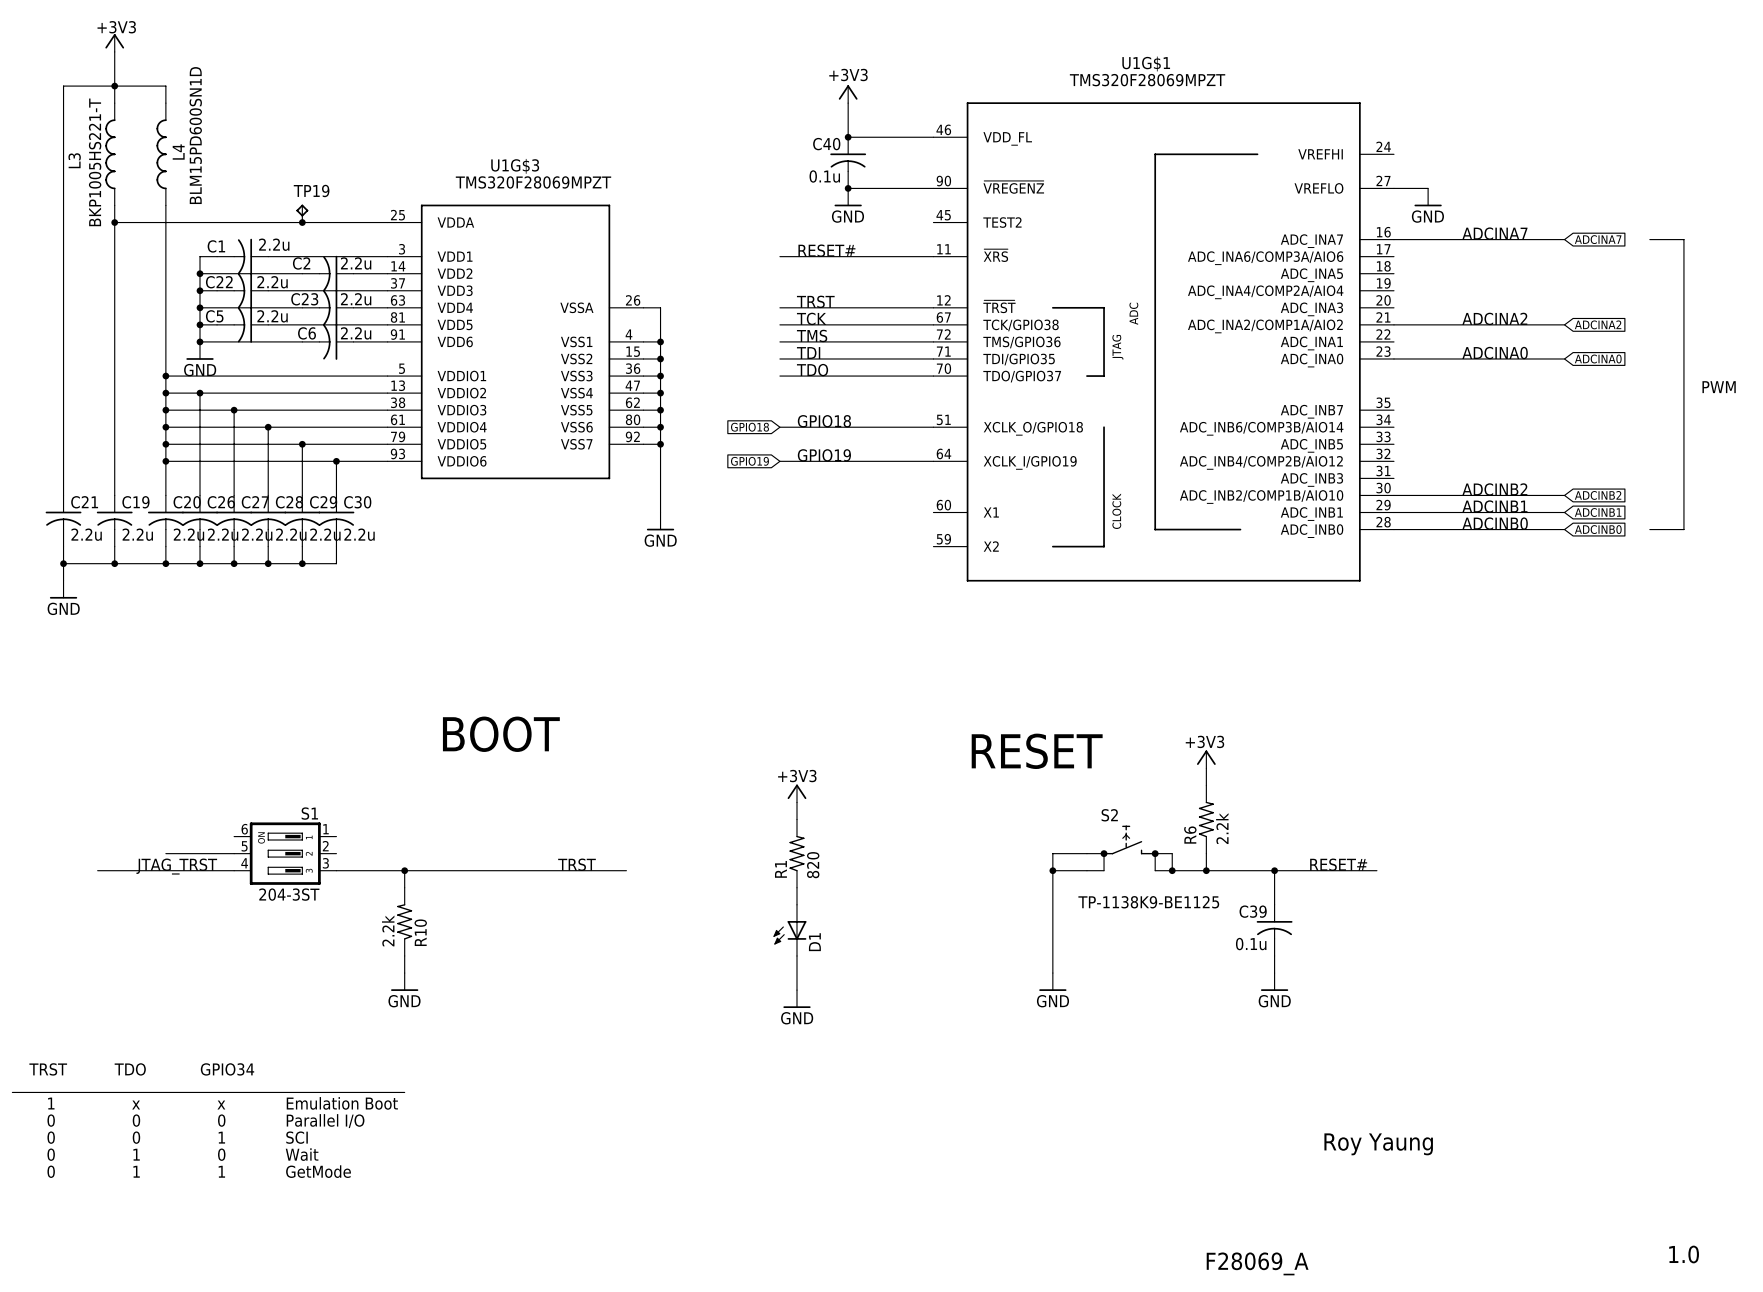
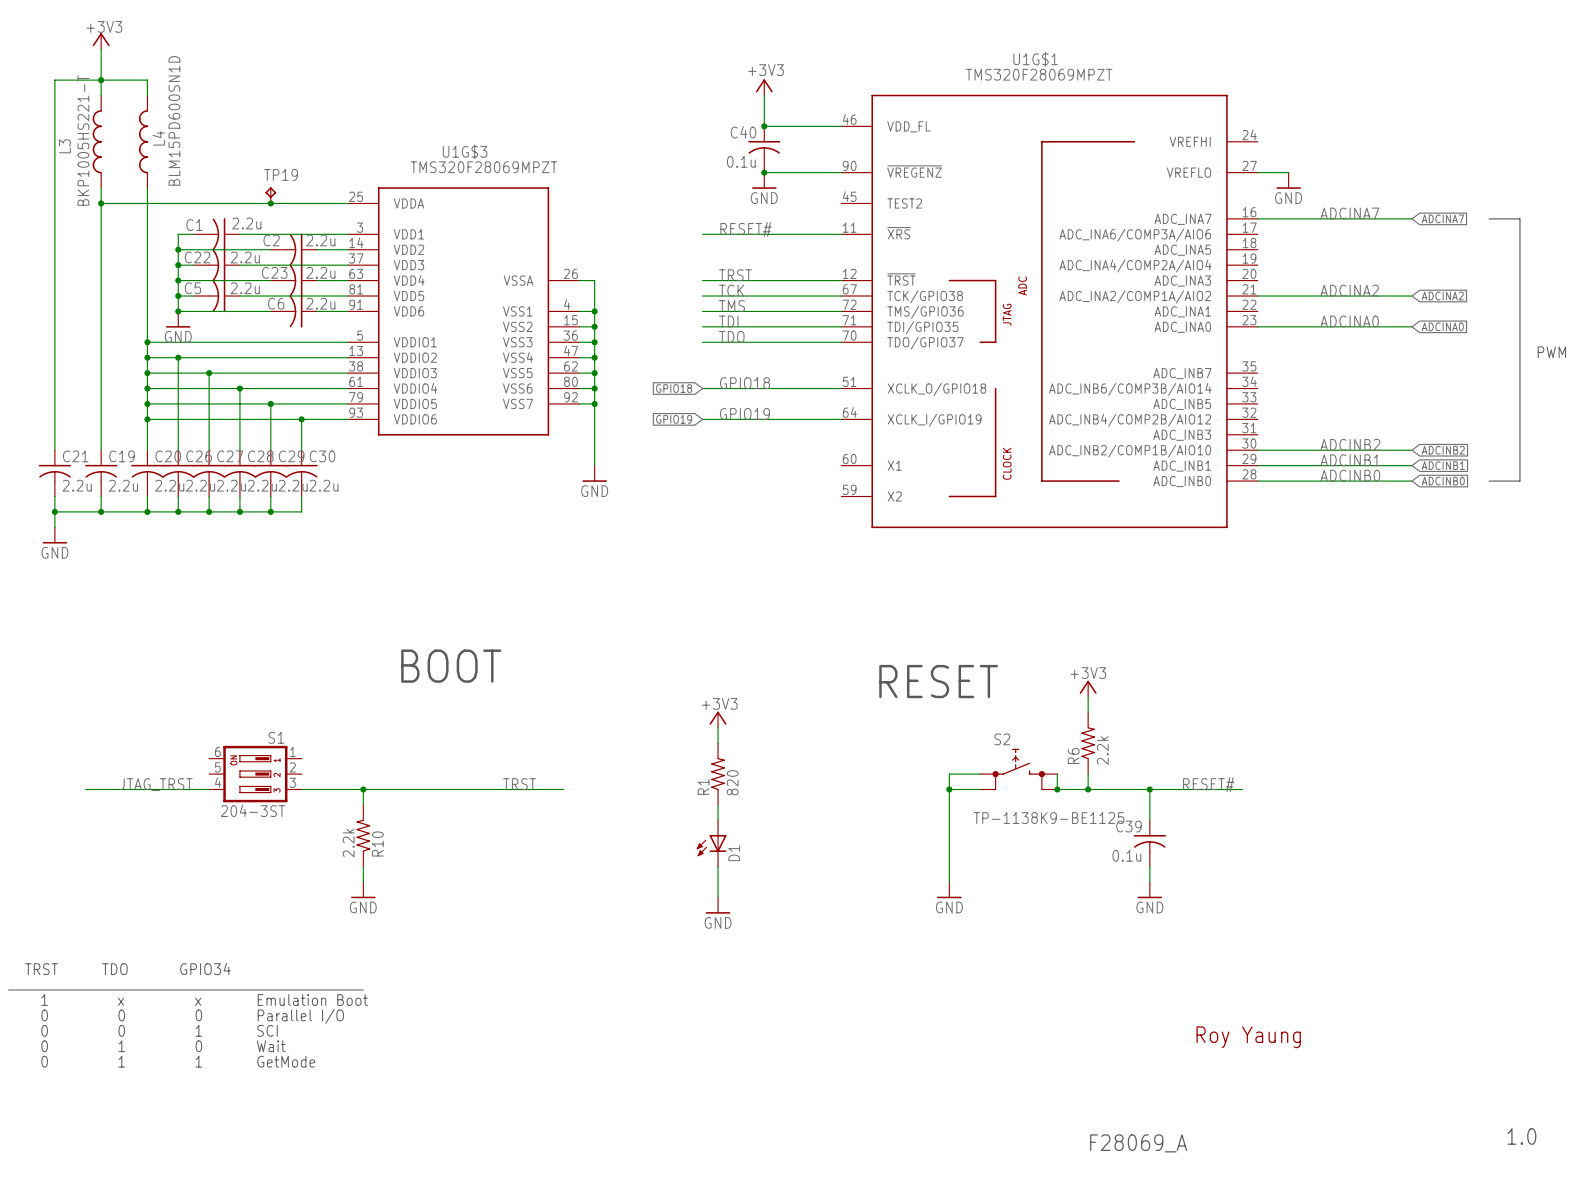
wire: (165, 853) (234, 853) -> none

